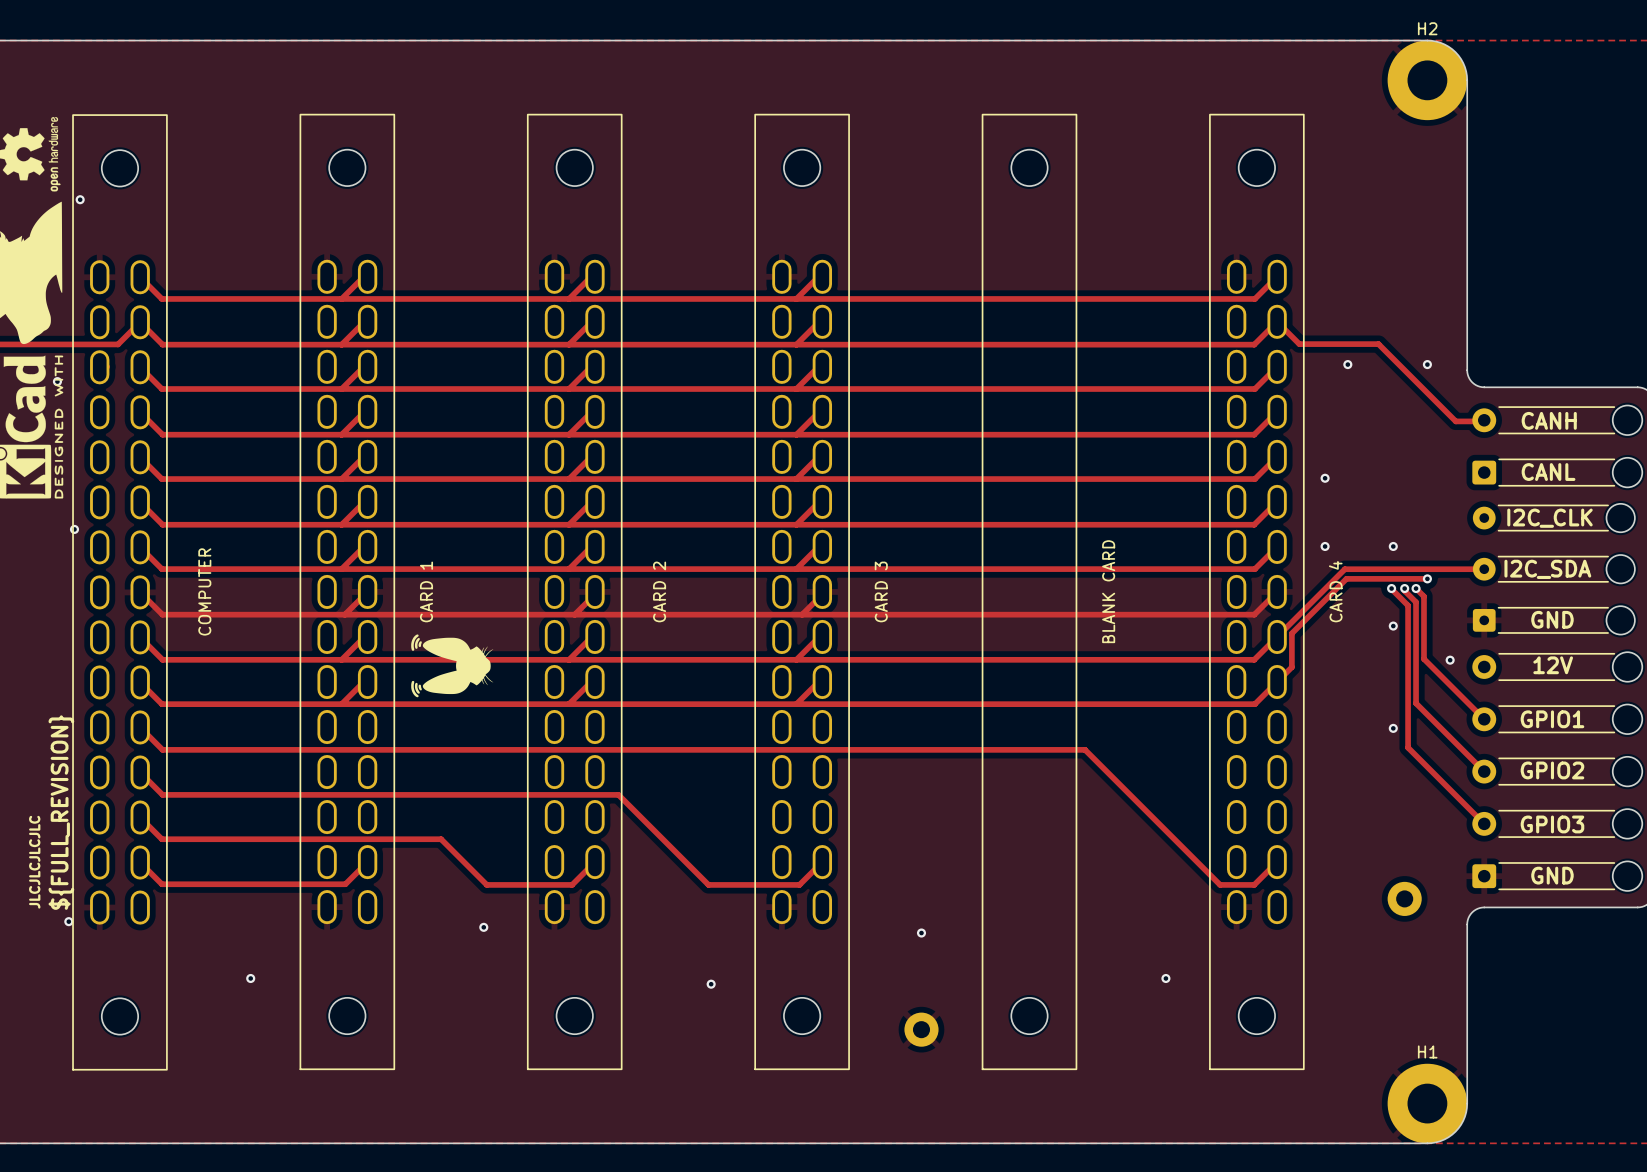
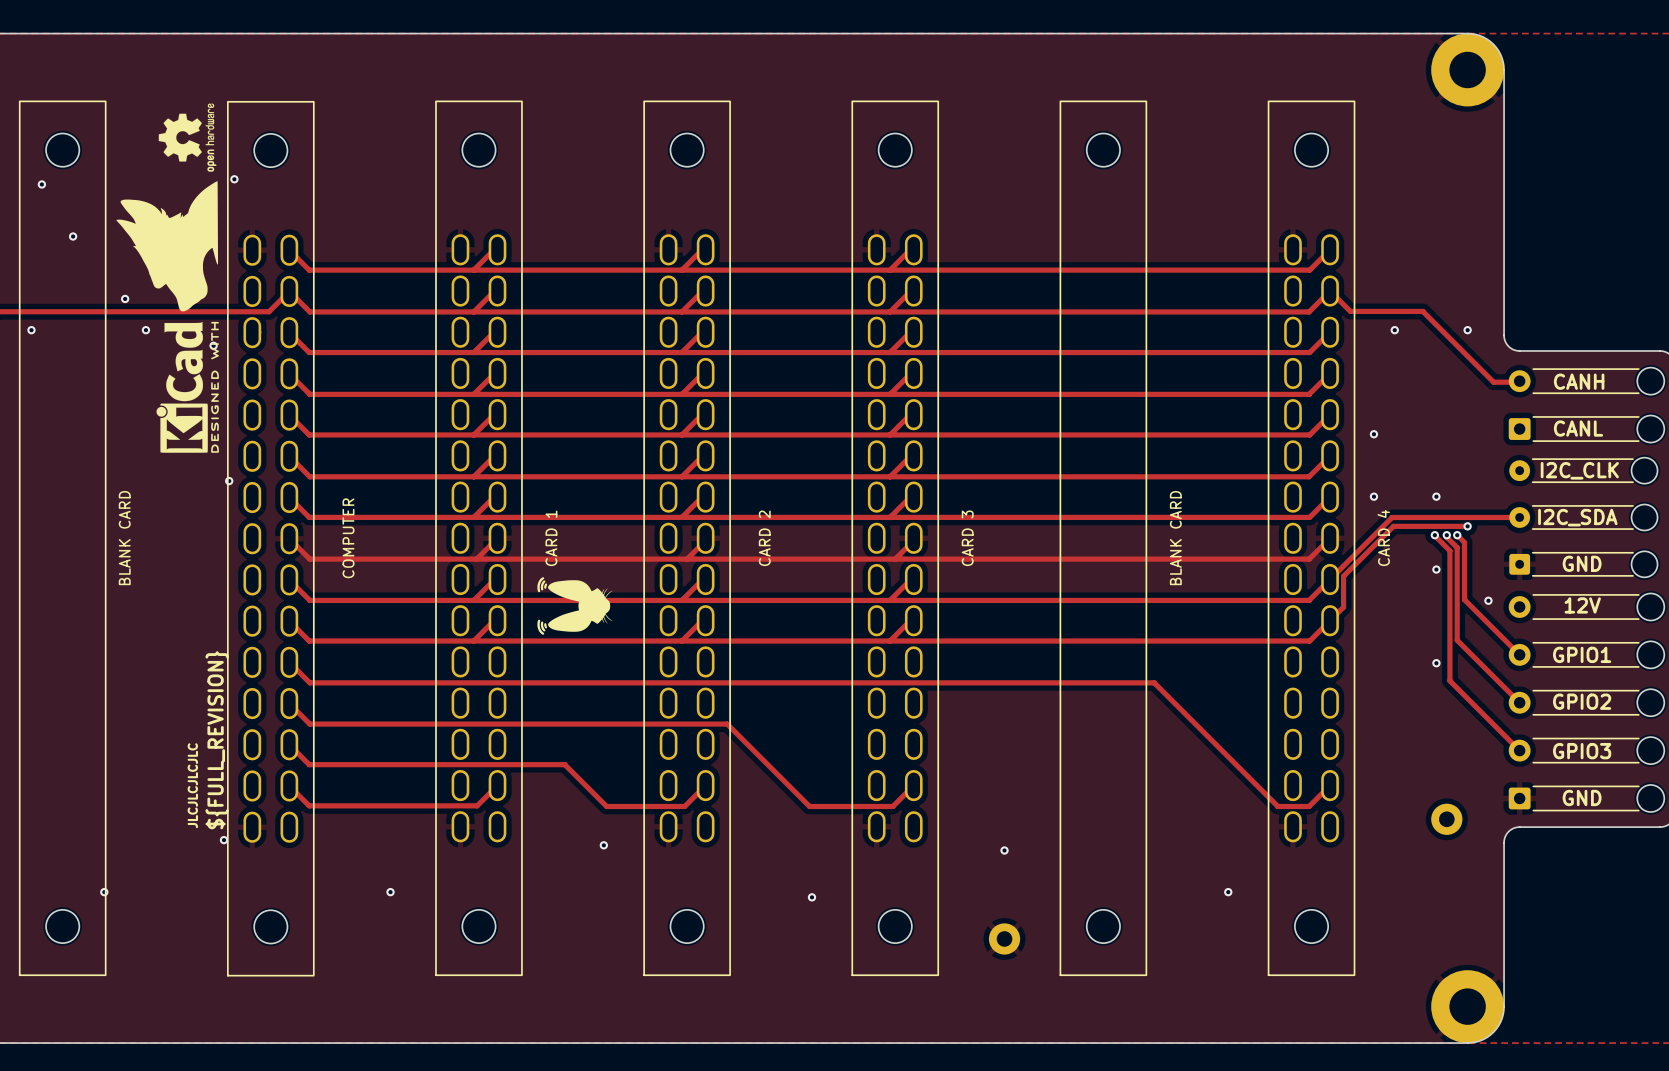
H2 name: H2 (1427, 28) -> none
H1 name: H1 (1427, 1051) -> none

